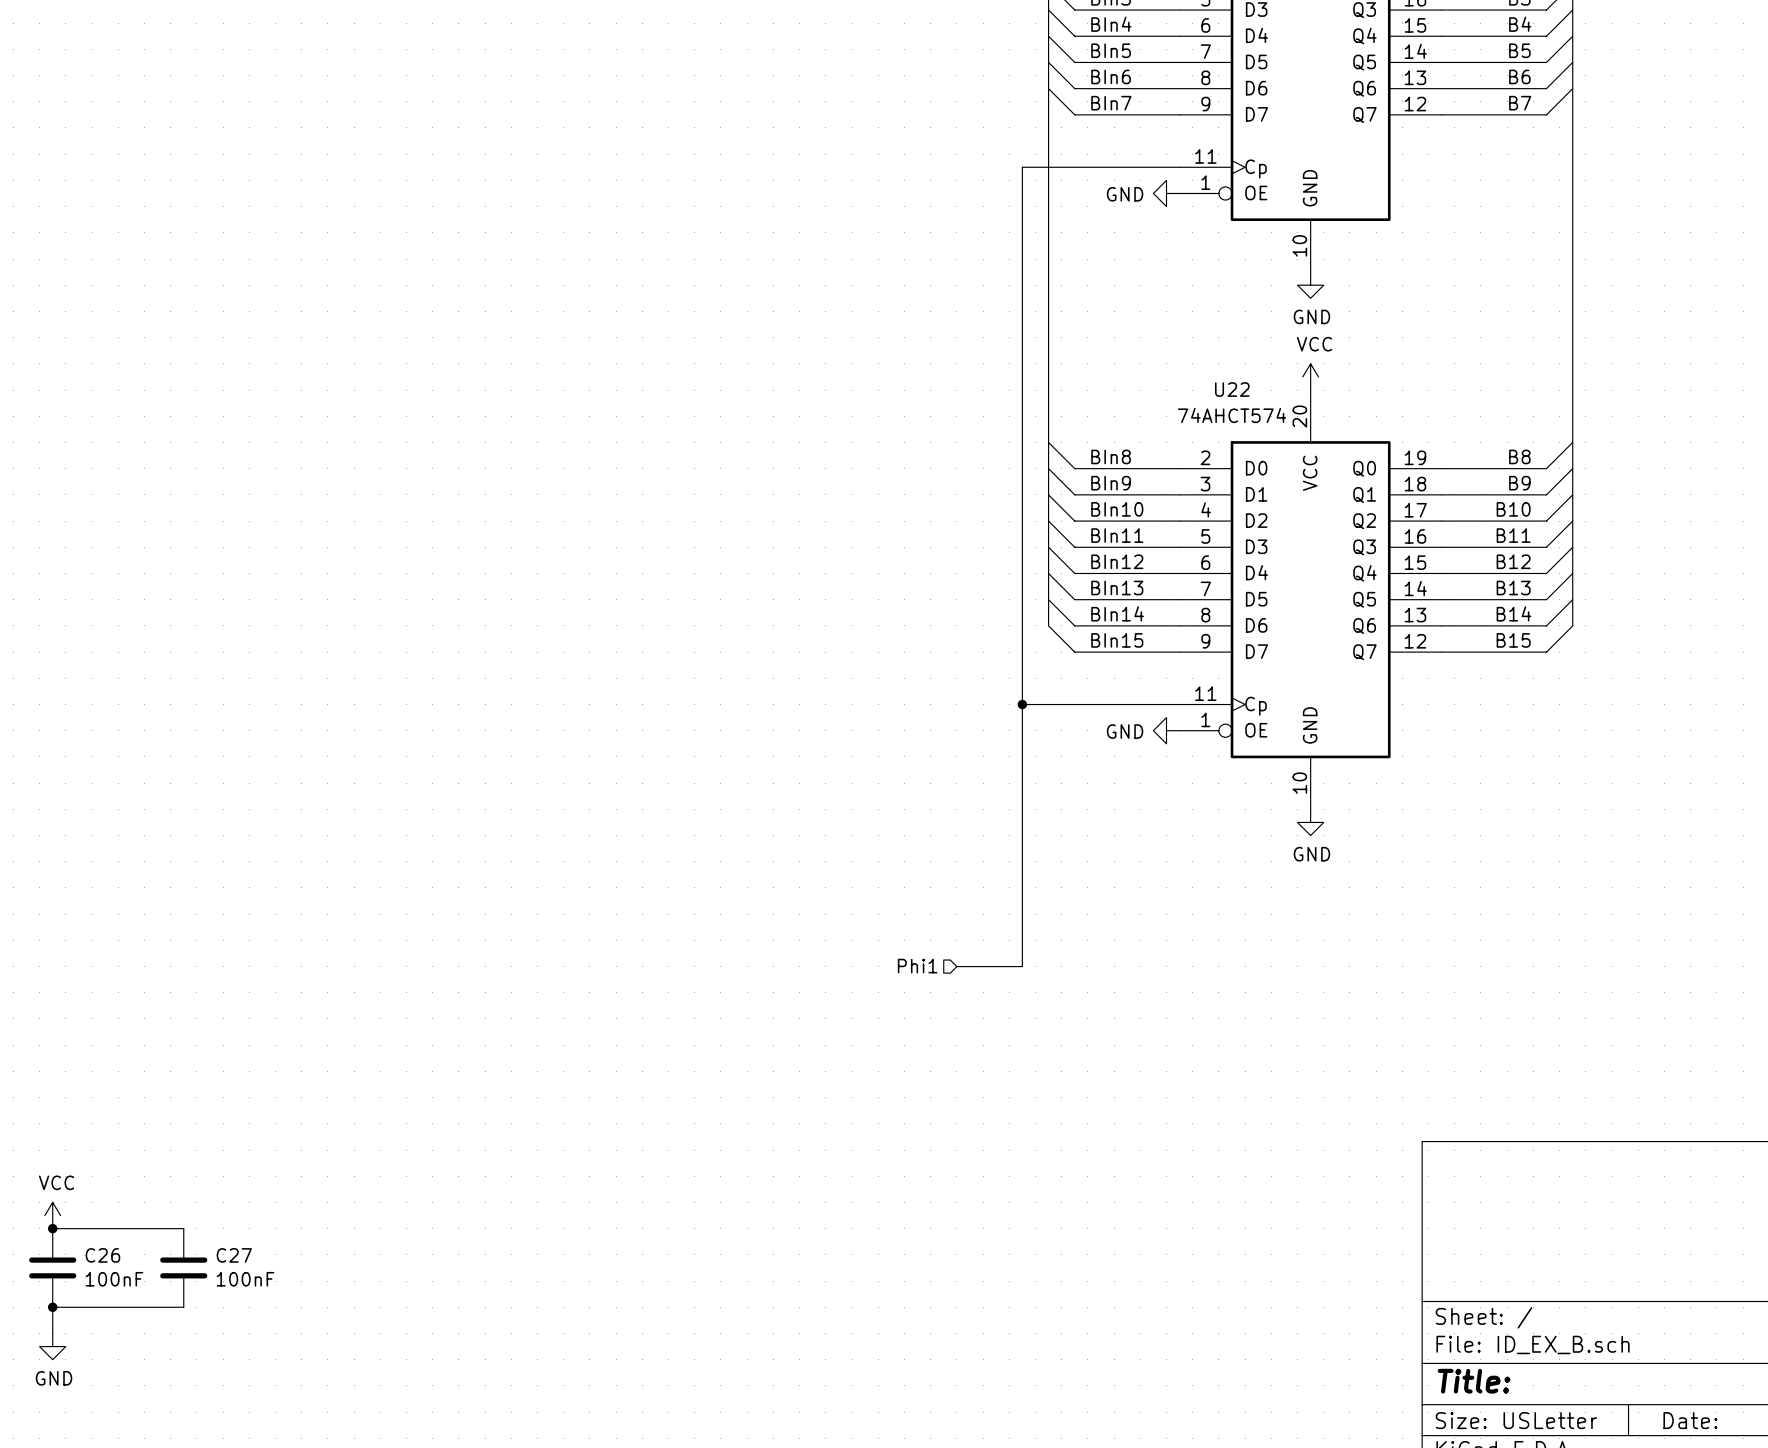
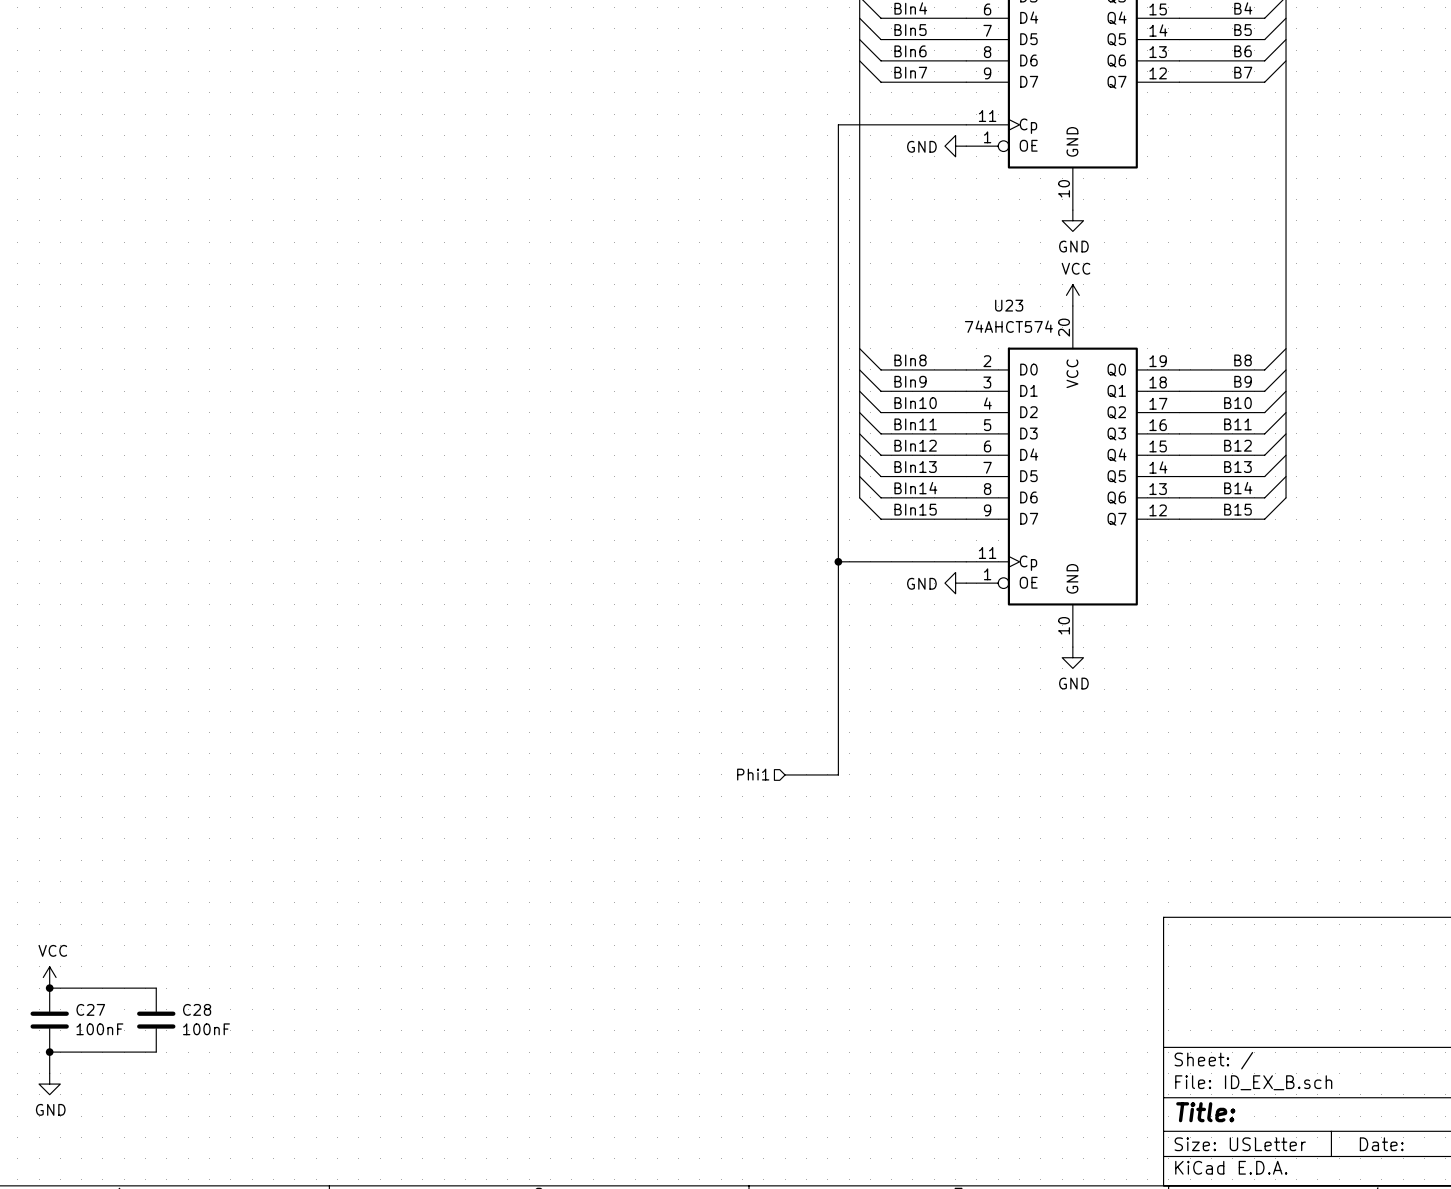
U22 name: U22 (1232, 389) -> U23 (1009, 305)
C26 name: C26 (102, 1255) -> C27 (90, 1009)
C27 name: C27 (234, 1255) -> C28 (197, 1009)

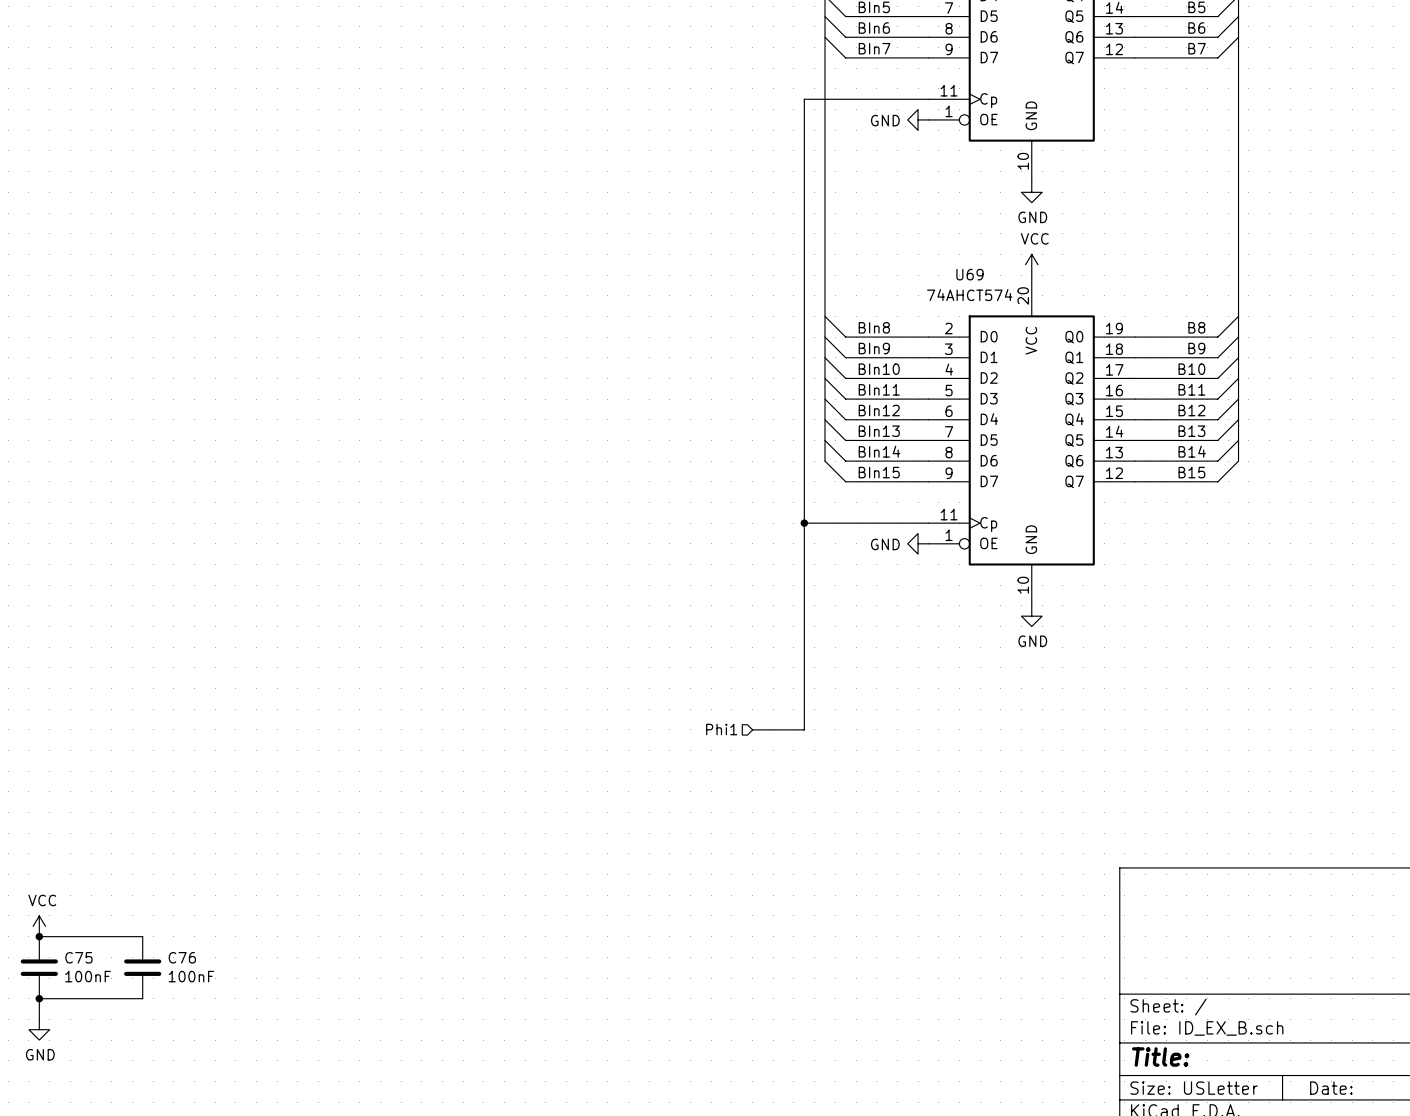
U23 name: U23 (1009, 305) -> U69 (969, 274)
C27 name: C27 (90, 1009) -> C75 (78, 957)
C28 name: C28 (197, 1009) -> C76 (182, 957)

